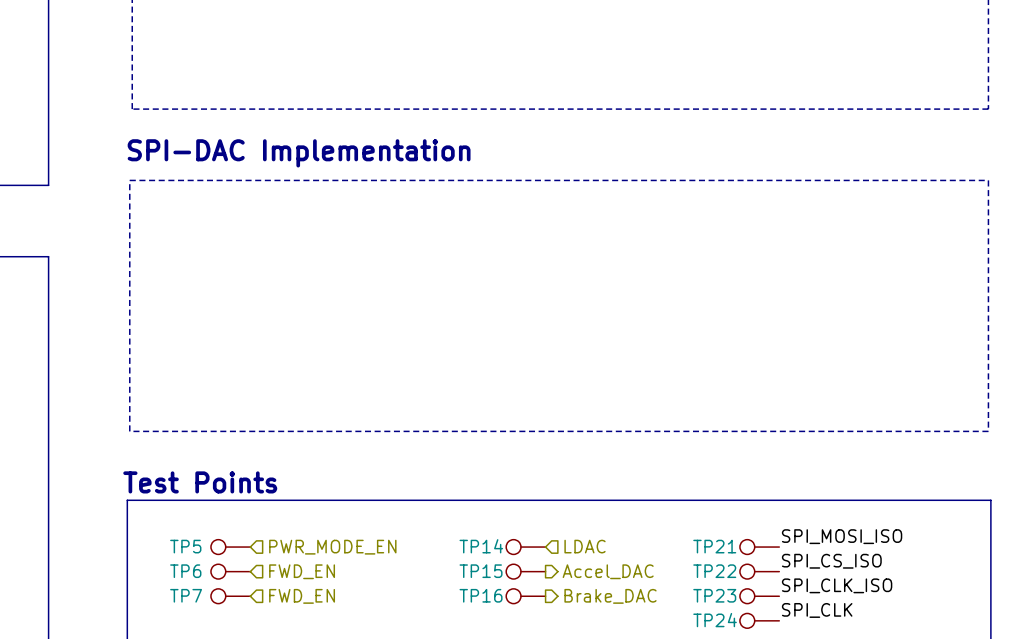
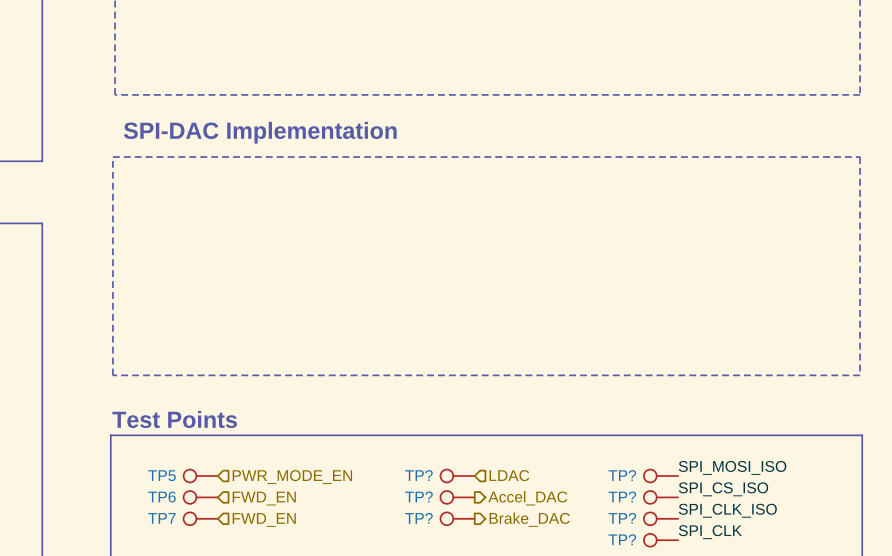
TP14 name: TP14 (481, 546) -> TP? (418, 475)
TP21 name: TP21 (714, 546) -> TP? (622, 475)
TP15 name: TP15 (481, 571) -> TP? (418, 496)
TP22 name: TP22 (714, 571) -> TP? (622, 496)
TP16 name: TP16 (481, 595) -> TP? (418, 518)
TP23 name: TP23 (714, 595) -> TP? (622, 518)
TP24 name: TP24 (715, 620) -> TP? (622, 539)

